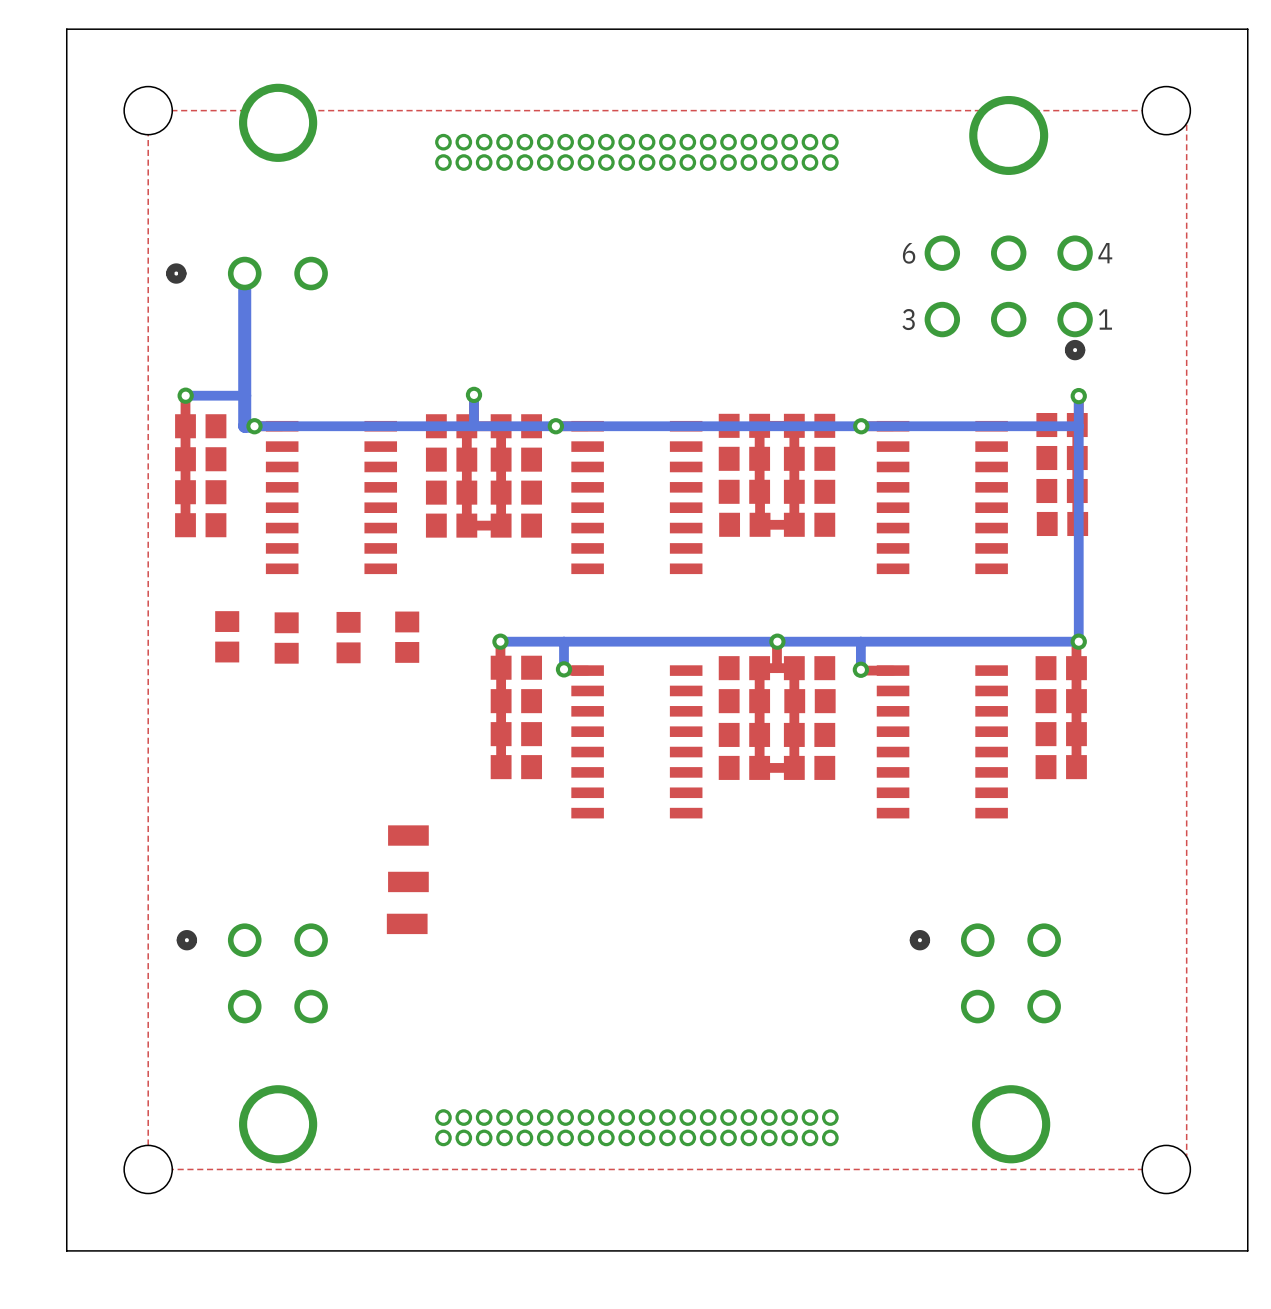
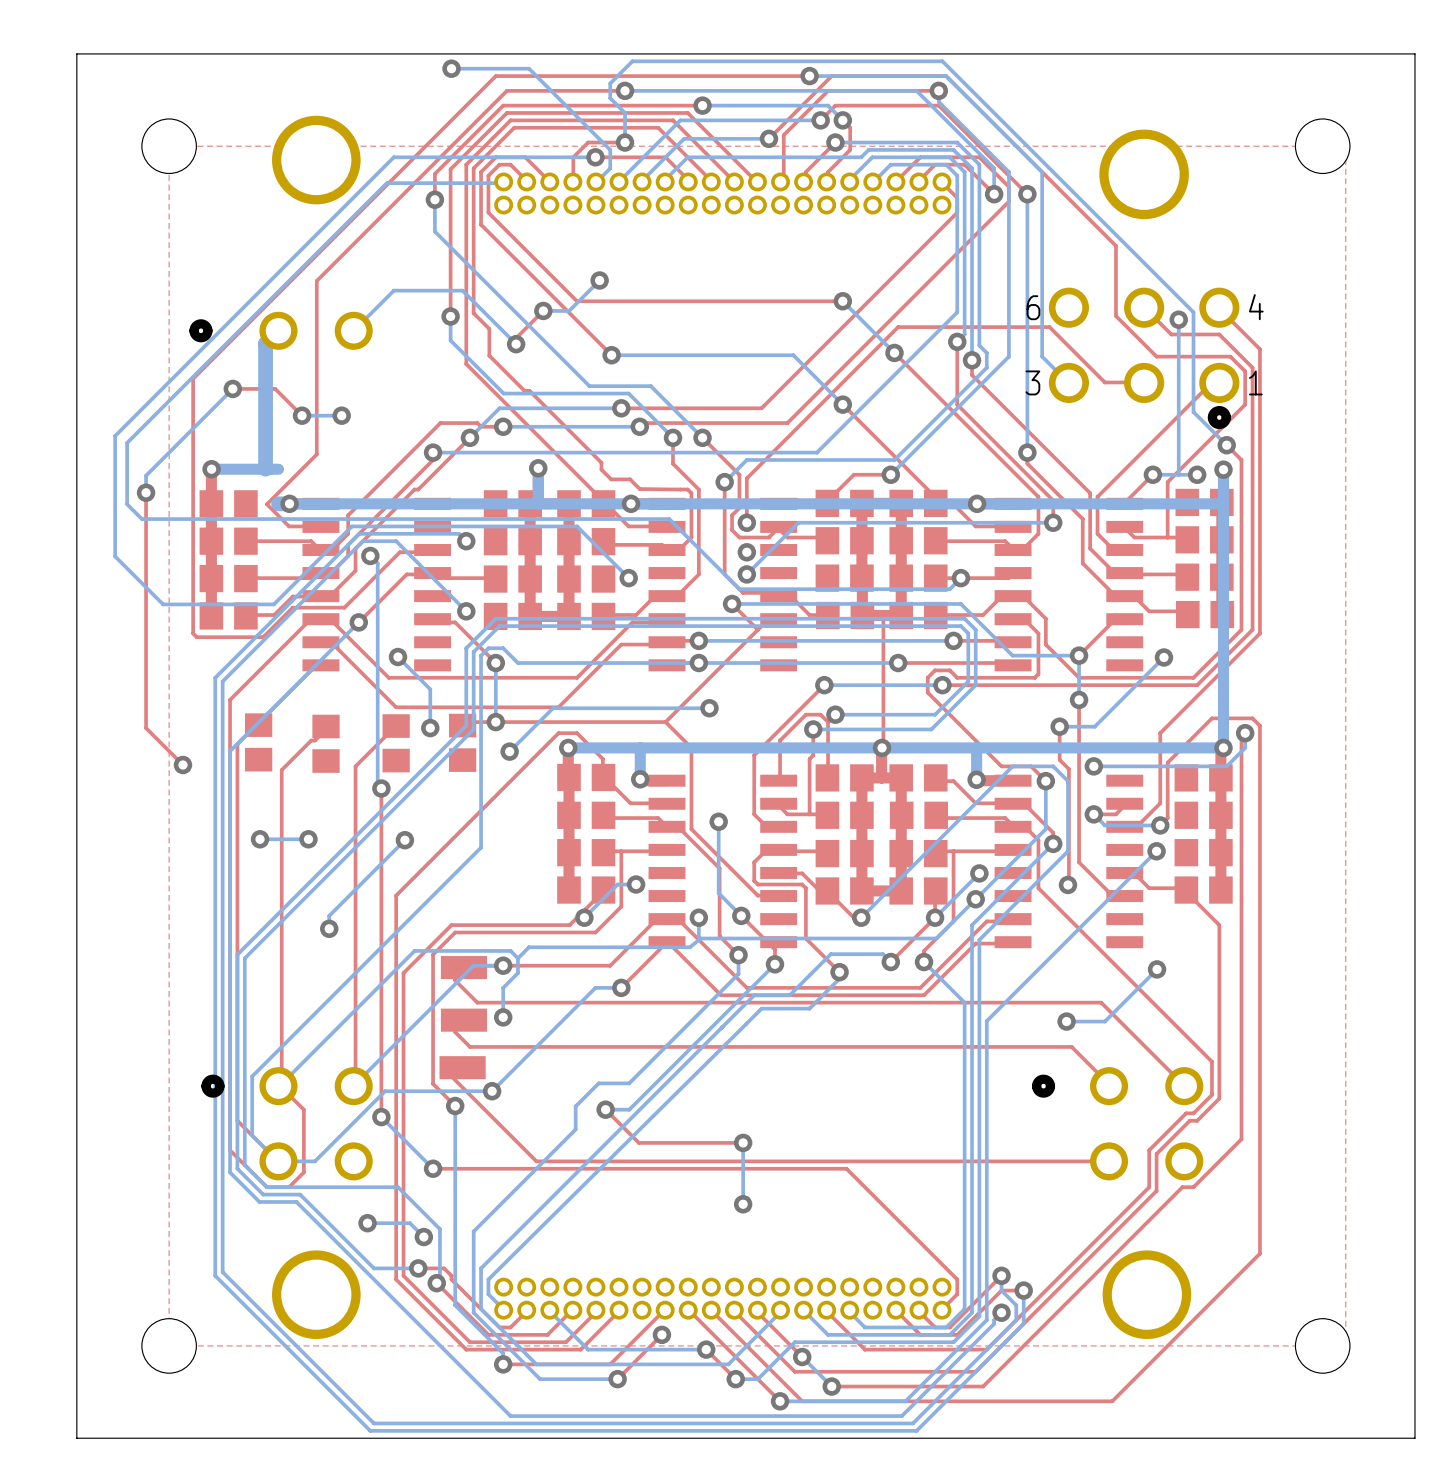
bottom track: none -> (451, 68) (529, 68) (610, 149) (610, 168) (595, 181)
via: none -> (451, 68)
bottom track: none -> (809, 76) (946, 76) (1042, 172) (1042, 356) (1068, 382)
top track: none -> (809, 76) (495, 76) (193, 378) (193, 633) (196, 637) (263, 637) (292, 607) (344, 607) (399, 552) (429, 552) (432, 549)
via: none -> (809, 76)
bottom track: none -> (625, 90) (916, 90) (994, 168) (994, 194)
top track: none -> (625, 90) (506, 90) (316, 280) (316, 454) (266, 504) (289, 526) (320, 526)
via: none -> (625, 90)
bottom track: none -> (938, 90) (938, 101) (1008, 172) (1008, 356) (890, 474)
top track: none -> (938, 90) (828, 90) (783, 135) (783, 179) (780, 181)
via: none -> (938, 90)
bottom track: none -> (702, 105) (828, 105) (842, 120)
top track: none -> (702, 105) (503, 105) (434, 173) (434, 199)
via: none -> (702, 105)
bottom track: none -> (820, 120) (680, 120) (619, 181)
top track: none -> (820, 120) (835, 105) (938, 105) (1027, 194)
via: none -> (820, 120)
top track: none -> (842, 120) (850, 127) (850, 149) (828, 172) (826, 181)
via: none -> (842, 120)
bottom track: none -> (768, 138) (684, 138) (642, 181)
top track: none -> (768, 138) (831, 76) (946, 76) (1115, 245) (1115, 316) (1156, 356) (1230, 356) (1245, 371) (1245, 404) (1167, 482) (1167, 537)
via: none -> (768, 138)
bottom track: none -> (625, 142) (625, 113) (610, 98) (610, 83) (632, 61) (942, 61) (1193, 312) (1193, 412) (1226, 445)
top track: none -> (625, 142) (588, 142) (573, 157) (572, 181)
via: none -> (625, 142)
bottom track: none -> (835, 142) (957, 142) (979, 164) (979, 345) (986, 352) (986, 367) (894, 459) (746, 459) (724, 482)
top track: none -> (835, 142) (805, 172) (805, 179) (803, 181)
via: none -> (835, 142)
bottom track: none -> (595, 157) (393, 157) (115, 436) (115, 556) (163, 604) (273, 604) (351, 526) (577, 526) (628, 578)
top track: none -> (595, 157) (665, 157) (688, 181)
via: none -> (595, 157)
bottom track: none -> (503, 181) (386, 183) (127, 442) (127, 504) (141, 519) (669, 519) (739, 589) (949, 589) (960, 578)
top track: none -> (526, 181) (510, 164) (499, 164) (488, 175) (488, 212) (577, 301) (842, 301)
top track: none -> (549, 181) (525, 157) (495, 157) (481, 172) (481, 224) (611, 355)
bottom track: none -> (665, 181) (687, 157) (861, 157) (868, 149) (953, 149) (972, 168) (972, 360)
top track: none -> (711, 181) (658, 127) (514, 127) (473, 168) (473, 313) (489, 328) (489, 355) (524, 390) (529, 390) (601, 462) (601, 469) (611, 479) (630, 479) (639, 489) (687, 489) (691, 493) (691, 537) (680, 548) (667, 549) (661, 544) (606, 544) (603, 541)
top track: none -> (734, 181) (673, 120) (510, 120) (466, 164) (466, 364) (602, 500) (603, 503) (606, 504) (628, 526) (667, 526)
top track: none -> (757, 181) (687, 113) (506, 113) (450, 169) (450, 316)
bottom track: none -> (849, 181) (872, 157) (949, 157) (964, 172) (964, 334) (957, 341)
bottom track: none -> (872, 181) (890, 164) (946, 164) (957, 175) (957, 312) (816, 452) (433, 452)
top track: none -> (895, 181) (920, 157) (979, 157) (1008, 186) (1008, 201) (787, 423) (643, 423) (639, 426)
top track: none -> (918, 181) (935, 164) (964, 164) (994, 194)
top track: none -> (942, 181) (957, 197) (957, 212) (761, 408) (621, 408)
via: none -> (994, 194)
bottom track: none -> (1027, 194) (1027, 452)
via: none -> (1027, 194)
bottom track: none -> (434, 199) (434, 231) (589, 386) (650, 386) (702, 437)
via: none -> (434, 199)
bottom track: none -> (599, 280) (569, 310) (543, 310)
via: none -> (599, 280)
bottom track: none -> (842, 301) (894, 352)
via: none -> (842, 301)
top track: none -> (1144, 307) (1171, 334) (1219, 334) (1252, 367) (1252, 629) (1197, 685) (942, 685)
top track: none -> (1219, 307) (1259, 349) (1259, 633) (1160, 733) (1160, 803) (1138, 825) (1124, 826)
top track: none -> (543, 310) (516, 338) (516, 344)
via: none -> (543, 310)
bottom track: none -> (450, 316) (450, 340) (503, 393) (628, 393) (673, 437)
via: none -> (450, 316)
bottom track: none -> (1178, 319) (1178, 474)
via: none -> (1178, 319)
bottom track: (244, 273) (244, 426) -> (278, 330) (265, 343) (265, 469)
bottom track: none -> (353, 330) (393, 290) (462, 290) (516, 344)
top track: none -> (957, 341) (957, 404) (1053, 500) (1053, 522)
via: none -> (957, 341)
via: none -> (516, 344)
top track: none -> (894, 352) (1038, 496) (1038, 533) (1023, 548) (1013, 549) (1005, 541) (935, 540)
via: none -> (894, 352)
bottom track: none -> (611, 355) (793, 355) (842, 404)
via: none -> (611, 355)
top track: none -> (972, 360) (972, 375) (1090, 493) (1090, 548) (1112, 570) (1123, 570) (1127, 574) (1186, 574) (1187, 577)
via: none -> (972, 360)
top track: none -> (1144, 382) (1104, 382) (1049, 327) (898, 327) (746, 478) (746, 522)
top track: none -> (1219, 382) (1219, 386) (1208, 386) (1097, 496) (1097, 533) (1112, 548) (1124, 549)
bottom track: none -> (232, 388) (146, 475) (146, 492)
top track: none -> (232, 388) (275, 388) (302, 415)
via: none -> (232, 388)
top track: none -> (842, 404) (938, 500) (935, 503) (953, 504) (975, 526) (1013, 526)
via: none -> (842, 404)
bottom track: none -> (621, 408) (499, 408) (469, 437)
via: none -> (621, 408)
via: none -> (302, 415)
bottom track: none -> (341, 415) (302, 415)
via: none -> (341, 415)
top track: none -> (503, 426) (481, 426) (477, 423) (440, 423) (348, 515) (348, 533) (333, 548) (320, 549) (311, 541) (245, 541)
via: none -> (503, 426)
bottom track: none -> (639, 426) (503, 426)
via: none -> (639, 426)
top track: none -> (469, 437) (355, 548) (355, 570) (333, 592) (322, 592) (318, 596) (292, 596) (274, 615) (245, 615)
via: none -> (469, 437)
top track: none -> (673, 437) (673, 463) (698, 489) (698, 574) (680, 592) (669, 592) (665, 596) (654, 596) (636, 615) (603, 616)
via: none -> (673, 437)
top track: none -> (702, 437) (739, 474) (739, 507) (732, 515) (732, 530) (739, 537) (768, 537) (778, 526) (787, 537) (824, 537) (827, 540)
via: none -> (702, 437)
top track: none -> (1226, 445) (1241, 459) (1241, 629) (1193, 677) (1079, 677) (1045, 644) (1045, 618) (1023, 596) (1001, 596) (983, 615) (935, 615)
via: none -> (1226, 445)
top track: none -> (433, 452) (433, 459) (348, 544) (348, 555) (333, 570) (322, 570) (314, 578) (245, 578)
via: none -> (433, 452)
top track: none -> (1027, 452) (1027, 463) (1082, 519) (1082, 563) (1112, 592) (1123, 592) (1124, 596) (1134, 596) (1149, 611) (1186, 611) (1187, 614)
via: none -> (1027, 452)
top track: none -> (890, 474) (853, 474) (827, 503) (824, 500) (780, 500) (778, 503)
via: none -> (890, 474)
top track: none -> (1152, 474) (1124, 503)
via: none -> (1152, 474)
bottom track: none -> (1197, 474) (1152, 474)
via: none -> (1197, 474)
top track: none -> (724, 482) (724, 574) (743, 592) (776, 592) (780, 596) (791, 596) (809, 615) (827, 615)
via: none -> (724, 482)
top track: none -> (146, 492) (146, 728) (182, 765)
via: none -> (146, 492)
via: none -> (746, 522)
bottom track: none -> (1053, 522) (798, 522) (746, 574)
via: none -> (1053, 522)
top track: none -> (1124, 526) (1134, 537) (1186, 537) (1187, 539)
bottom track: none -> (466, 541) (458, 533) (359, 533) (215, 677) (215, 1275) (370, 1430) (916, 1430) (1023, 1323) (1023, 1290)
via: none -> (466, 541)
via: none -> (746, 552)
bottom track: none -> (370, 555) (377, 563) (377, 784) (381, 788)
via: none -> (370, 555)
top track: none -> (1013, 573) (1008, 578) (935, 578)
via: none -> (746, 574)
via: none -> (628, 578)
via: none -> (960, 578)
top track: none -> (495, 579) (436, 578) (432, 573) (406, 574) (358, 622)
bottom track: none -> (732, 603) (960, 603) (1012, 655) (1079, 655) (1079, 699)
top track: none -> (732, 603) (757, 629)
via: none -> (732, 603)
bottom track: none -> (466, 611) (396, 541) (362, 541) (222, 681) (222, 1272) (374, 1423) (912, 1423) (1016, 1320) (1016, 1305) (1001, 1290) (1001, 1275)
via: none -> (466, 611)
top track: none -> (883, 615) (882, 747)
top track: none -> (432, 619) (433, 622) (455, 622) (495, 663)
top track: none -> (667, 619) (665, 622) (632, 622) (577, 677) (388, 677) (333, 622) (322, 622) (320, 619) (318, 622) (307, 622) (230, 699) (230, 1150) (266, 1187) (289, 1187) (303, 1172) (303, 1109) (278, 1086) (281, 1083) (281, 770) (311, 740) (314, 740) (326, 729) (326, 726)
top track: none -> (778, 619) (776, 622) (765, 622) (665, 722)
top track: none -> (1013, 619) (1016, 622) (1027, 622) (1038, 633) (1038, 674) (1034, 677) (957, 677) (949, 670) (935, 670) (927, 677) (927, 692) (1001, 766) (1031, 766) (1045, 781)
top track: none -> (1124, 619) (1123, 622) (1112, 622) (1079, 655)
bottom track: none -> (358, 622) (230, 751) (230, 1172) (259, 1201) (296, 1201) (510, 1416) (901, 1416) (994, 1323) (994, 1320) (1001, 1312)
via: none -> (358, 622)
top track: none -> (698, 640) (669, 640) (665, 644) (621, 644) (558, 707) (396, 707) (333, 644) (322, 644) (320, 642)
via: none -> (698, 640)
bottom track: none -> (953, 640) (698, 640)
top track: none -> (953, 640) (1013, 642)
via: none -> (953, 640)
via: none -> (1079, 655)
bottom track: none -> (397, 657) (430, 689) (430, 728)
via: none -> (397, 657)
bottom track: none -> (1163, 657) (1094, 726) (1059, 726)
via: none -> (1163, 657)
bottom track: none -> (495, 663) (495, 722)
via: none -> (495, 663)
via: none -> (698, 663)
bottom track: none -> (898, 663) (517, 663) (503, 648) (488, 648) (481, 655) (481, 847) (252, 1076) (252, 1135) (278, 1161) (314, 1161) (385, 1091) (492, 1091) (595, 987) (621, 987)
top track: none -> (898, 663) (1012, 663) (1013, 665)
via: none -> (898, 663)
top track: none -> (320, 665) (318, 663) (258, 725) (237, 744) (237, 1120) (278, 1161)
top track: none -> (824, 685) (754, 755) (754, 814) (765, 825) (778, 826)
via: none -> (824, 685)
bottom track: none -> (942, 685) (824, 685)
via: none -> (942, 685)
top track: none -> (1079, 699) (1079, 862) (1112, 895) (1124, 896)
via: none -> (1079, 699)
bottom track: none -> (709, 708) (553, 708) (509, 751)
via: none -> (709, 708)
bottom track: none -> (835, 714) (935, 714) (968, 681) (968, 633) (960, 626) (499, 626) (473, 651) (473, 729) (244, 958) (244, 1165) (266, 1187) (397, 1187) (439, 1229) (439, 1279) (436, 1283)
via: none -> (835, 714)
via: none -> (495, 722)
top track: none -> (665, 722) (462, 722) (462, 725)
top track: none -> (665, 722) (691, 747) (691, 829) (757, 895) (778, 896)
top track: none -> (828, 722) (827, 777)
top track: none -> (828, 722) (820, 714) (805, 714) (780, 740) (778, 780)
top track: none -> (396, 725) (355, 766) (355, 1083) (353, 1086)
top track: none -> (1059, 726) (1059, 759) (1068, 769) (1067, 884)
via: none -> (1059, 726)
via: none -> (430, 728)
bottom track: none -> (813, 729) (931, 729) (975, 685) (975, 629) (964, 618) (495, 618) (466, 648) (466, 725) (237, 954) (237, 1168) (263, 1194) (300, 1194) (374, 1268) (418, 1268)
top track: none -> (813, 729) (813, 755) (809, 759) (809, 814)
via: none -> (813, 729)
top track: none -> (1241, 733) (1241, 1139) (1193, 1187) (1182, 1187) (983, 1386) (831, 1386)
bottom track: none -> (1245, 733) (1245, 747) (1226, 766) (1093, 766)
via: none -> (1245, 733)
via: none -> (509, 751)
via: none -> (182, 765)
via: none -> (1093, 766)
top track: none -> (935, 777) (938, 781) (953, 781) (975, 803) (1012, 803) (1016, 806) (1027, 806) (1053, 832) (1053, 843)
bottom track: none -> (1045, 781) (1045, 829) (936, 938) (698, 938)
via: none -> (1045, 781)
top track: none -> (381, 788) (381, 1117)
via: none -> (381, 788)
top track: none -> (667, 803) (630, 803) (602, 777) (602, 759) (577, 733) (558, 733) (396, 895) (396, 1279) (466, 1349) (580, 1349) (619, 1310)
top track: none -> (778, 803) (787, 814) (827, 815)
top track: none -> (1124, 803) (1115, 814) (1093, 814)
bottom track: none -> (1093, 814) (1104, 825) (1160, 825)
via: none -> (1093, 814)
top track: none -> (603, 815) (606, 818) (658, 818) (669, 829) (680, 829) (719, 868) (719, 936) (738, 955)
top track: none -> (936, 815) (938, 818) (1005, 818) (1016, 829) (1027, 829) (1038, 840) (1038, 888) (1211, 1061) (1211, 1094) (1193, 1113) (1186, 1113) (1149, 1150) (1149, 1187) (986, 1349) (864, 1349) (826, 1310)
bottom track: none -> (718, 821) (718, 893) (741, 915)
via: none -> (718, 821)
top track: none -> (1160, 825) (1167, 818) (1167, 762) (1211, 718) (1252, 718) (1259, 725) (1259, 1253) (1112, 1401) (802, 1401) (711, 1310)
via: none -> (1160, 825)
via: none -> (260, 839)
bottom track: none -> (308, 839) (260, 839)
via: none -> (308, 839)
bottom track: none -> (404, 840) (329, 915) (329, 928)
via: none -> (404, 840)
bottom track: none -> (1053, 843) (972, 925) (972, 1312) (949, 1334) (828, 1334) (803, 1310)
via: none -> (1053, 843)
top track: none -> (667, 849) (603, 852)
top track: none -> (1013, 849) (938, 851) (935, 853)
top track: none -> (621, 851) (621, 906) (595, 932) (455, 932) (433, 954) (433, 1083) (455, 1105)
top track: none -> (953, 851) (953, 921) (924, 950) (924, 962)
bottom track: none -> (1156, 851) (986, 1021) (986, 1320) (905, 1401) (780, 1401)
via: none -> (1156, 851)
top track: none -> (827, 853) (824, 851) (765, 851) (754, 862) (754, 880) (757, 884) (802, 884) (805, 888) (805, 938) (839, 972)
top track: none -> (778, 872) (802, 873) (816, 888) (824, 888) (853, 917) (861, 917)
bottom track: none -> (979, 873) (935, 917)
via: none -> (979, 873)
top track: none -> (1124, 872) (1134, 873) (1149, 888) (1186, 888) (1186, 891) (1219, 925) (1219, 1098) (1197, 1120) (1189, 1120) (1156, 1153) (1156, 1190) (975, 1371) (794, 1371) (734, 1310)
bottom track: none -> (636, 884) (617, 884) (584, 917)
via: none -> (636, 884)
via: none -> (1067, 884)
top track: none -> (603, 890) (569, 925) (451, 925) (403, 973) (403, 1275) (469, 1342) (565, 1342) (595, 1310)
top track: none -> (935, 890) (935, 917) (890, 962)
via: none -> (975, 899)
top track: none -> (741, 915) (774, 949) (774, 964)
via: none -> (741, 915)
via: none -> (584, 917)
bottom track: none -> (698, 917) (698, 940) (689, 947) (529, 947) (517, 958)
via: none -> (698, 917)
bottom track: none -> (861, 917) (1012, 766) (1053, 766) (1067, 781) (1067, 851) (979, 939) (979, 1316) (953, 1342) (794, 1342) (757, 1379) (735, 1379)
via: none -> (861, 917)
via: none -> (935, 917)
top track: none -> (1013, 919) (1012, 921) (986, 921) (920, 987) (746, 987) (680, 921) (669, 921) (667, 919) (665, 921) (654, 921) (610, 965) (477, 965) (475, 967)
via: none -> (329, 928)
top track: none -> (1013, 942) (975, 943) (924, 995) (721, 995) (667, 942) (621, 987)
bottom track: none -> (738, 955) (738, 974) (629, 1083) (598, 1083) (575, 1106) (575, 1129) (473, 1231) (473, 1312) (540, 1379) (617, 1379)
via: none -> (738, 955)
bottom track: none -> (517, 958) (517, 973) (503, 987) (503, 1017)
bottom track: none -> (517, 958) (510, 950) (414, 950) (278, 1086)
bottom track: none -> (890, 962) (882, 954) (830, 954) (789, 995) (754, 995) (481, 1268) (481, 1309) (536, 1364) (728, 1364) (780, 1310)
via: none -> (890, 962)
bottom track: none -> (924, 962) (964, 1002) (964, 1309) (946, 1327) (864, 1327) (849, 1310)
via: none -> (924, 962)
bottom track: none -> (774, 964) (751, 987)
via: none -> (774, 964)
bottom track: none -> (503, 965) (473, 965) (353, 1086)
via: none -> (503, 965)
top track: none -> (452, 967) (455, 969) (455, 980) (477, 1002) (1101, 1002) (1184, 1086)
bottom track: none -> (1157, 969) (1104, 1021) (1066, 1021)
via: none -> (1157, 969)
bottom track: none -> (839, 972) (839, 978) (809, 1008) (761, 1008) (488, 1279) (488, 1294) (503, 1310)
via: none -> (839, 972)
via: none -> (621, 987)
bottom track: none -> (751, 987) (629, 1109) (605, 1109)
via: none -> (503, 1017)
top track: none -> (452, 1020) (455, 1021) (455, 1032) (469, 1046) (1071, 1046) (1109, 1086)
via: none -> (1066, 1021)
top track: none -> (451, 1067) (451, 1076) (536, 1161) (1109, 1161)
via: none -> (492, 1091)
bottom track: none -> (455, 1105) (455, 1305) (503, 1353) (503, 1364)
via: none -> (455, 1105)
top track: none -> (605, 1109) (638, 1142) (743, 1142)
via: none -> (605, 1109)
bottom track: none -> (381, 1117) (433, 1168)
via: none -> (381, 1117)
bottom track: none -> (743, 1142) (743, 1204)
via: none -> (743, 1142)
top track: none -> (433, 1168) (846, 1168) (957, 1279) (957, 1294) (942, 1310)
via: none -> (433, 1168)
via: none -> (743, 1204)
bottom track: none -> (367, 1223) (409, 1223) (423, 1237)
via: none -> (367, 1223)
via: none -> (423, 1237)
top track: none -> (418, 1268) (444, 1268) (451, 1275) (451, 1279) (499, 1327) (510, 1327) (526, 1310)
via: none -> (418, 1268)
top track: none -> (1001, 1275) (949, 1327) (935, 1327) (918, 1310)
via: none -> (1001, 1275)
top track: none -> (436, 1283) (488, 1334) (547, 1334) (572, 1310)
via: none -> (436, 1283)
top track: none -> (1023, 1290) (1001, 1290) (957, 1334) (920, 1334) (895, 1310)
via: none -> (1023, 1290)
bottom track: none -> (549, 1310) (588, 1349) (706, 1349)
top track: none -> (665, 1310) (610, 1364) (503, 1364)
top track: none -> (688, 1310) (780, 1401)
top track: none -> (757, 1310) (802, 1357)
via: none -> (1001, 1312)
top track: none -> (661, 1334) (617, 1379)
via: none -> (661, 1334)
top track: none -> (706, 1349) (735, 1379)
via: none -> (706, 1349)
bottom track: none -> (802, 1357) (831, 1386)
via: none -> (802, 1357)
via: none -> (503, 1364)
via: none -> (617, 1379)
via: none -> (735, 1379)
via: none -> (831, 1386)
via: none -> (780, 1401)

